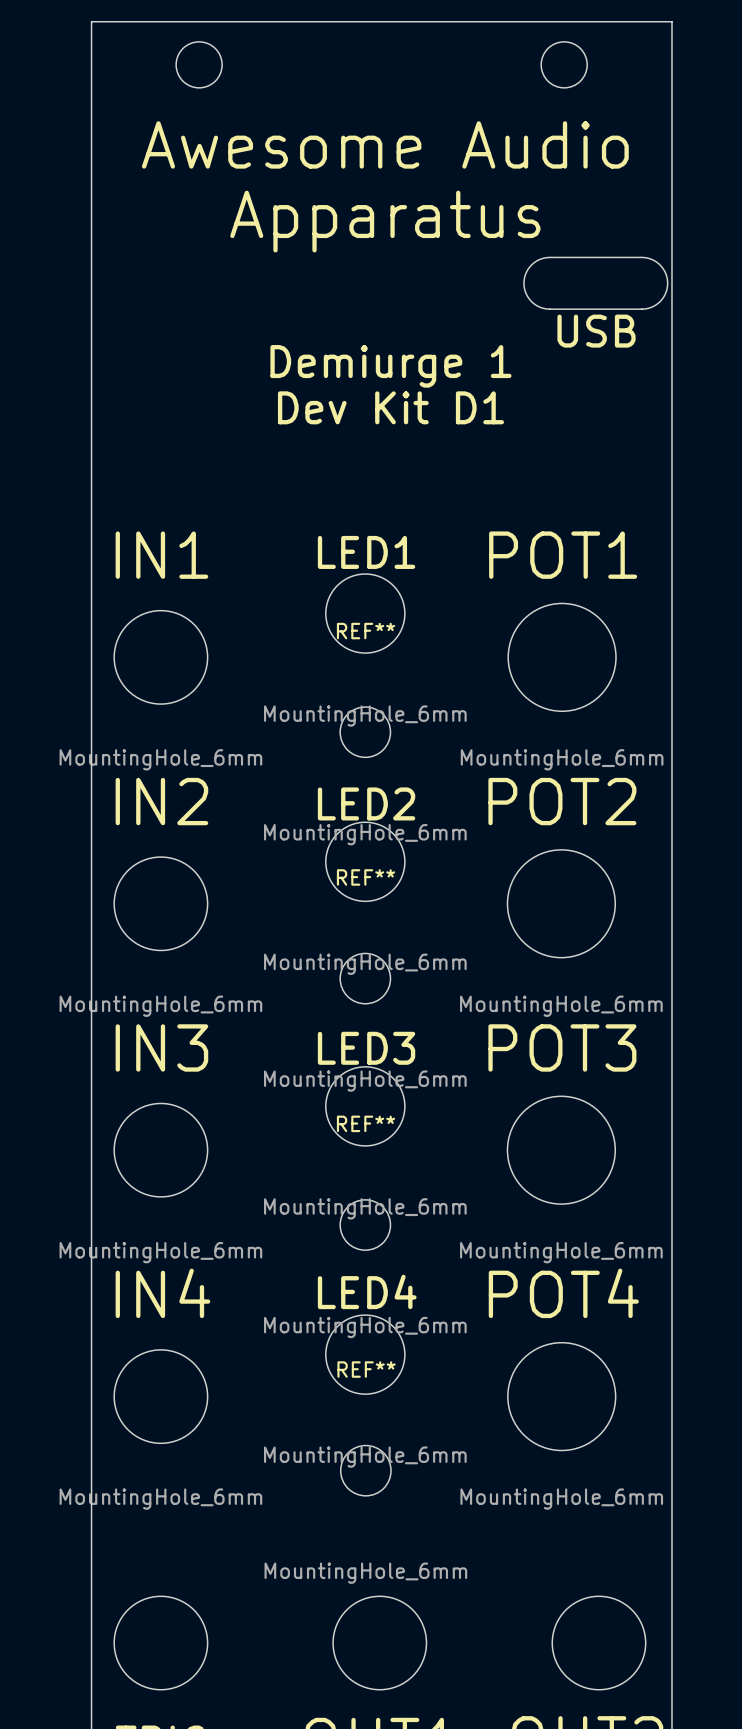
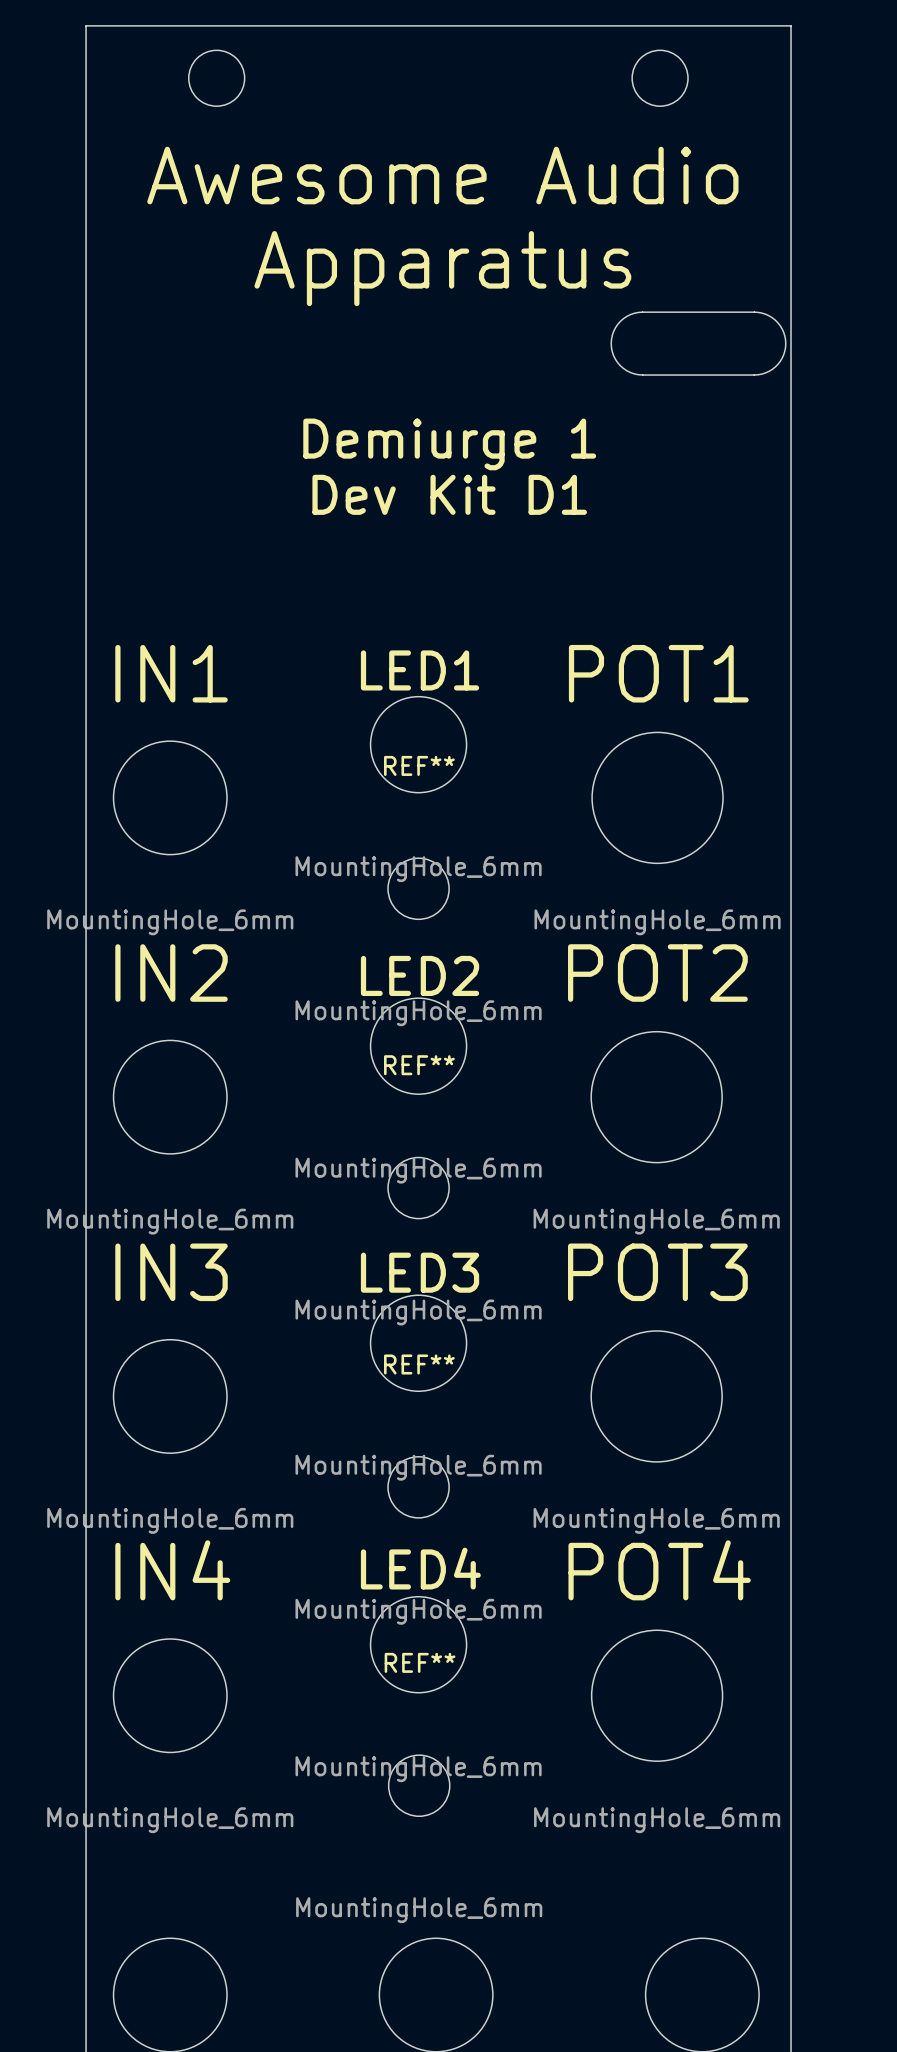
text: USB (596, 331) -> none

